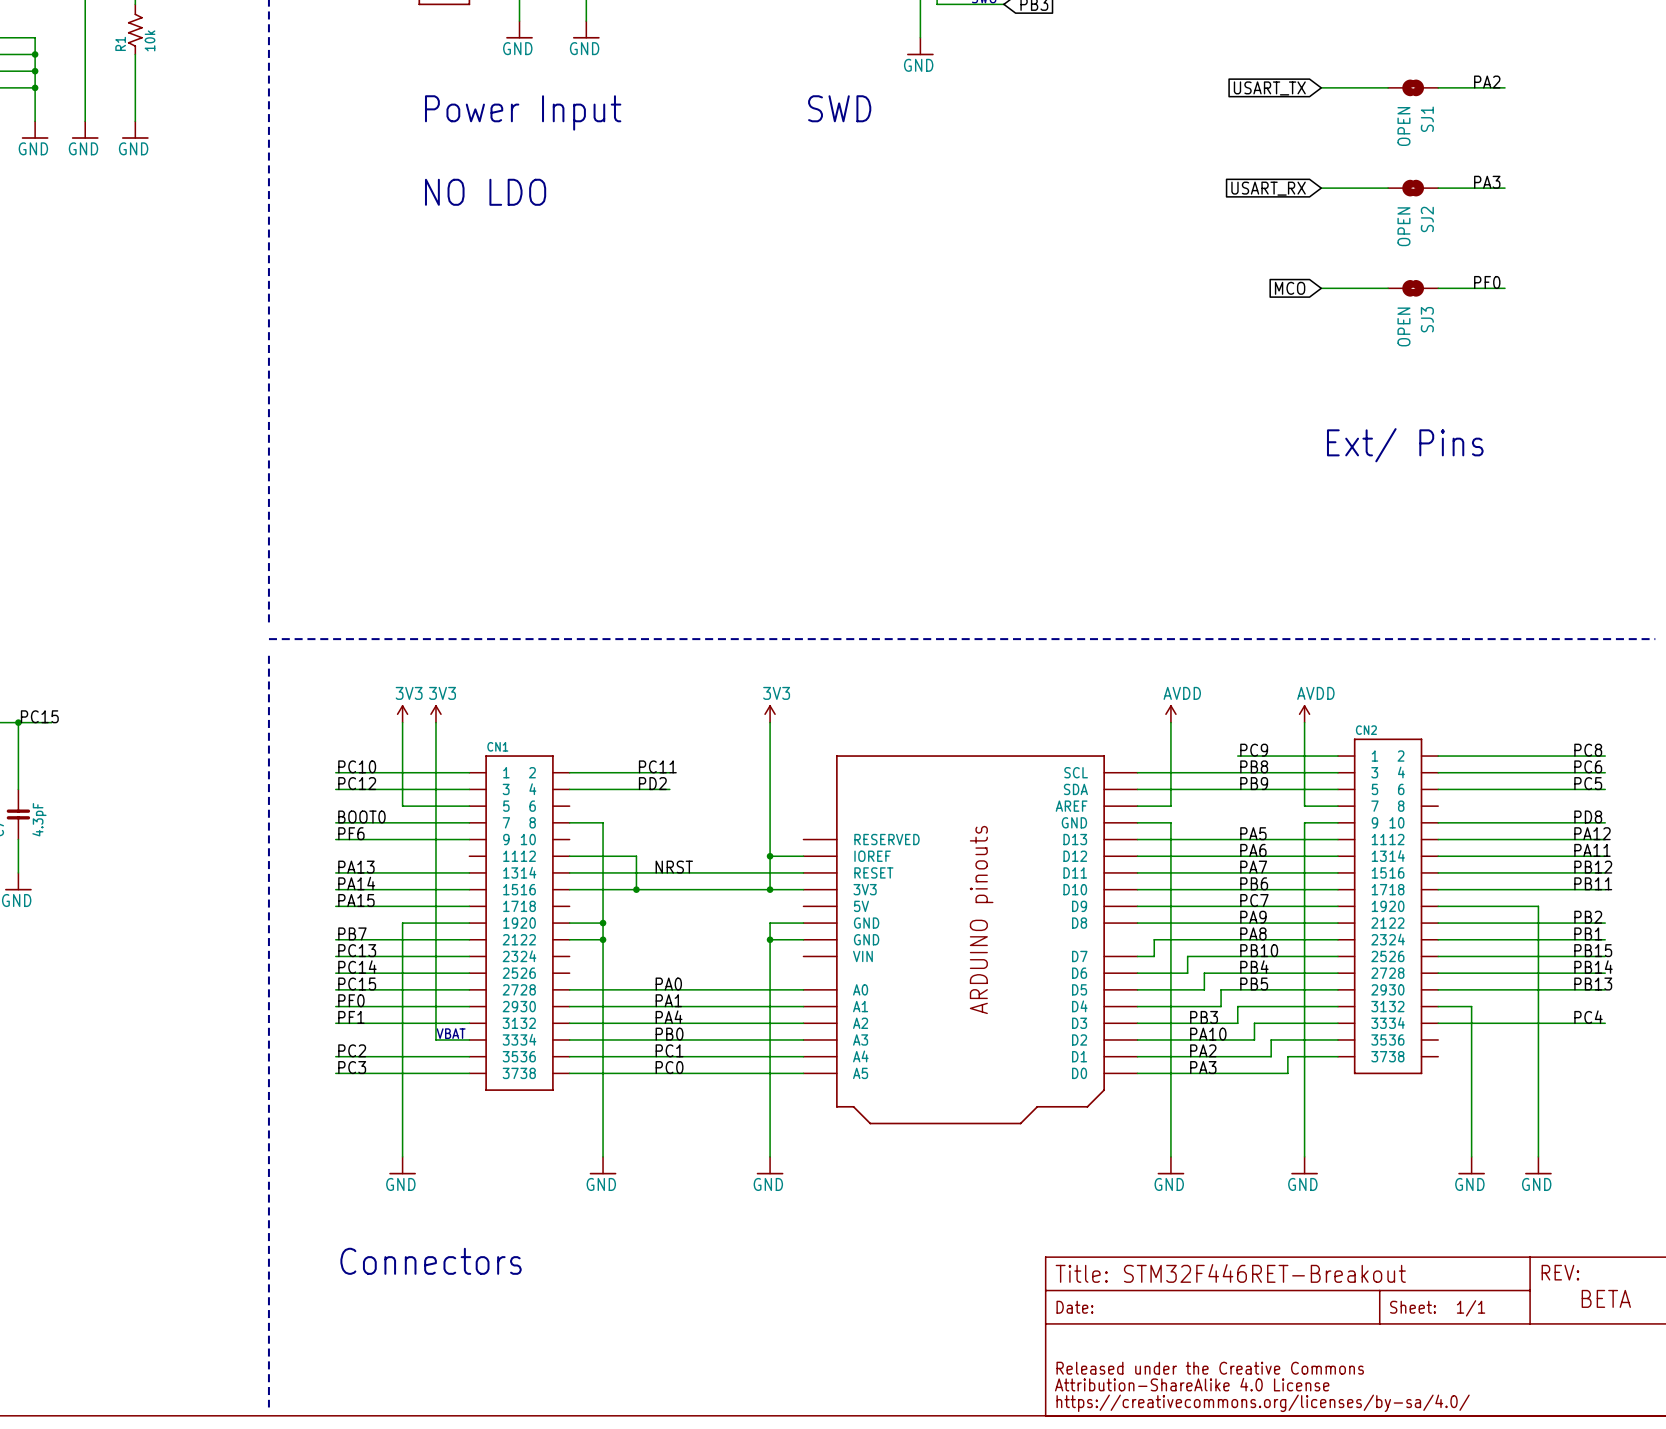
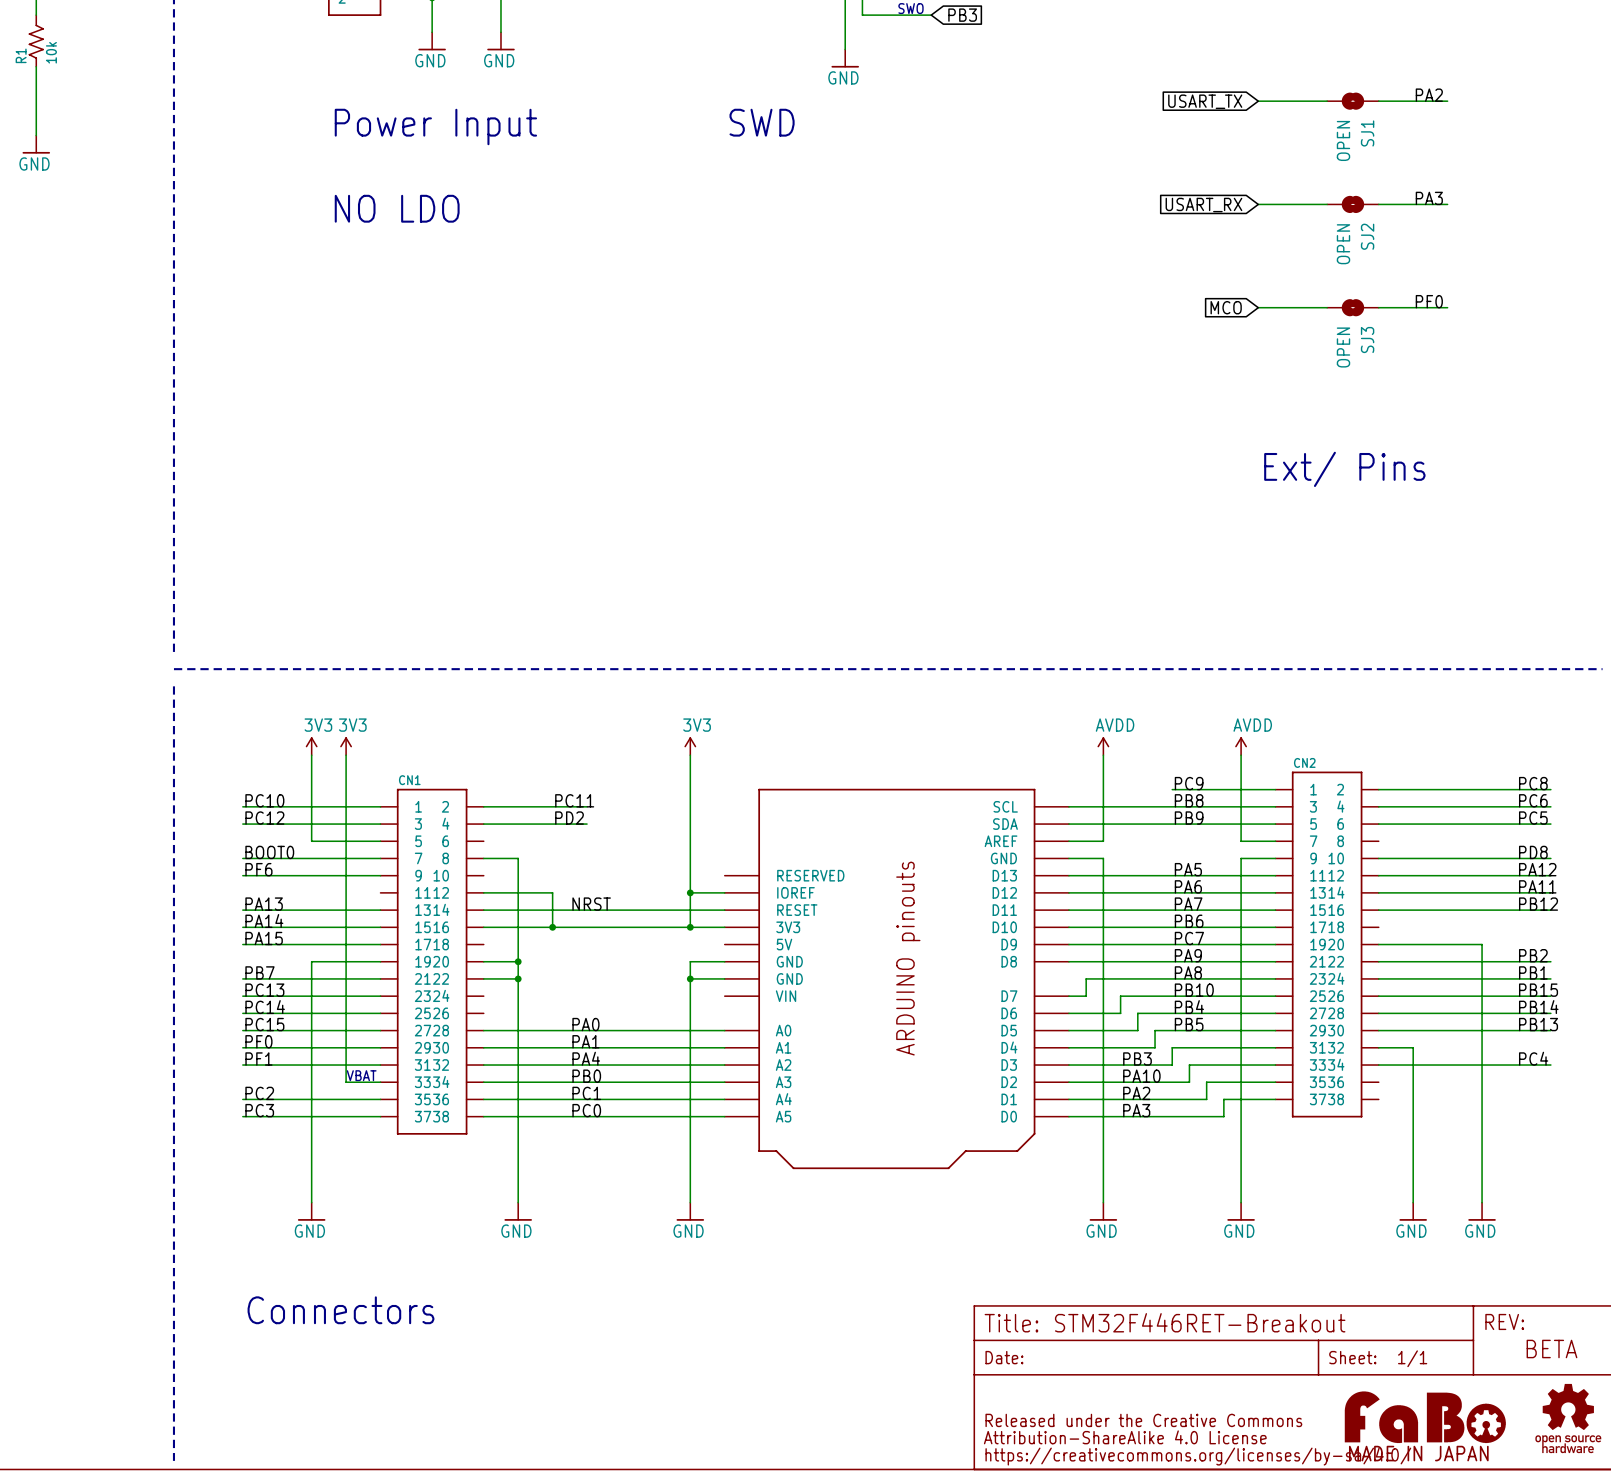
label: PB11 (1593, 883) -> none
wire: (1438, 889) (1605, 889) -> none
part: none -> (1425, 1417)
part: none -> (1568, 1418)

